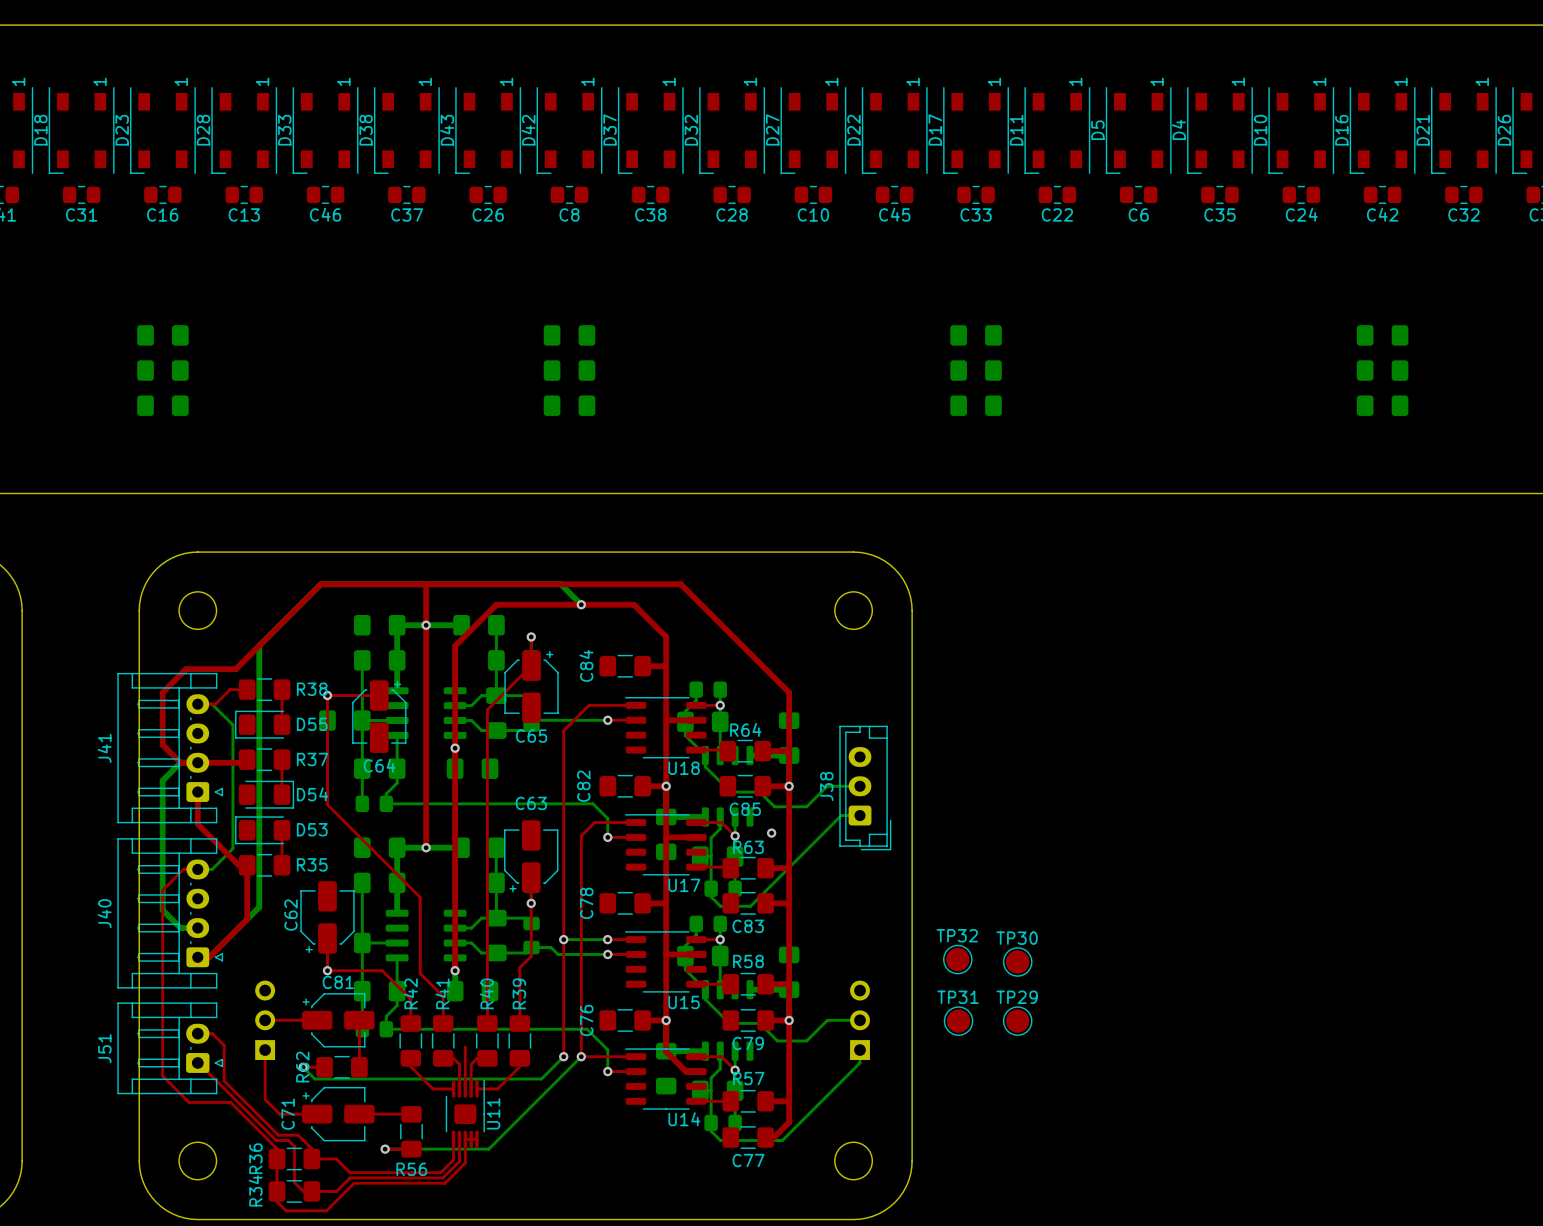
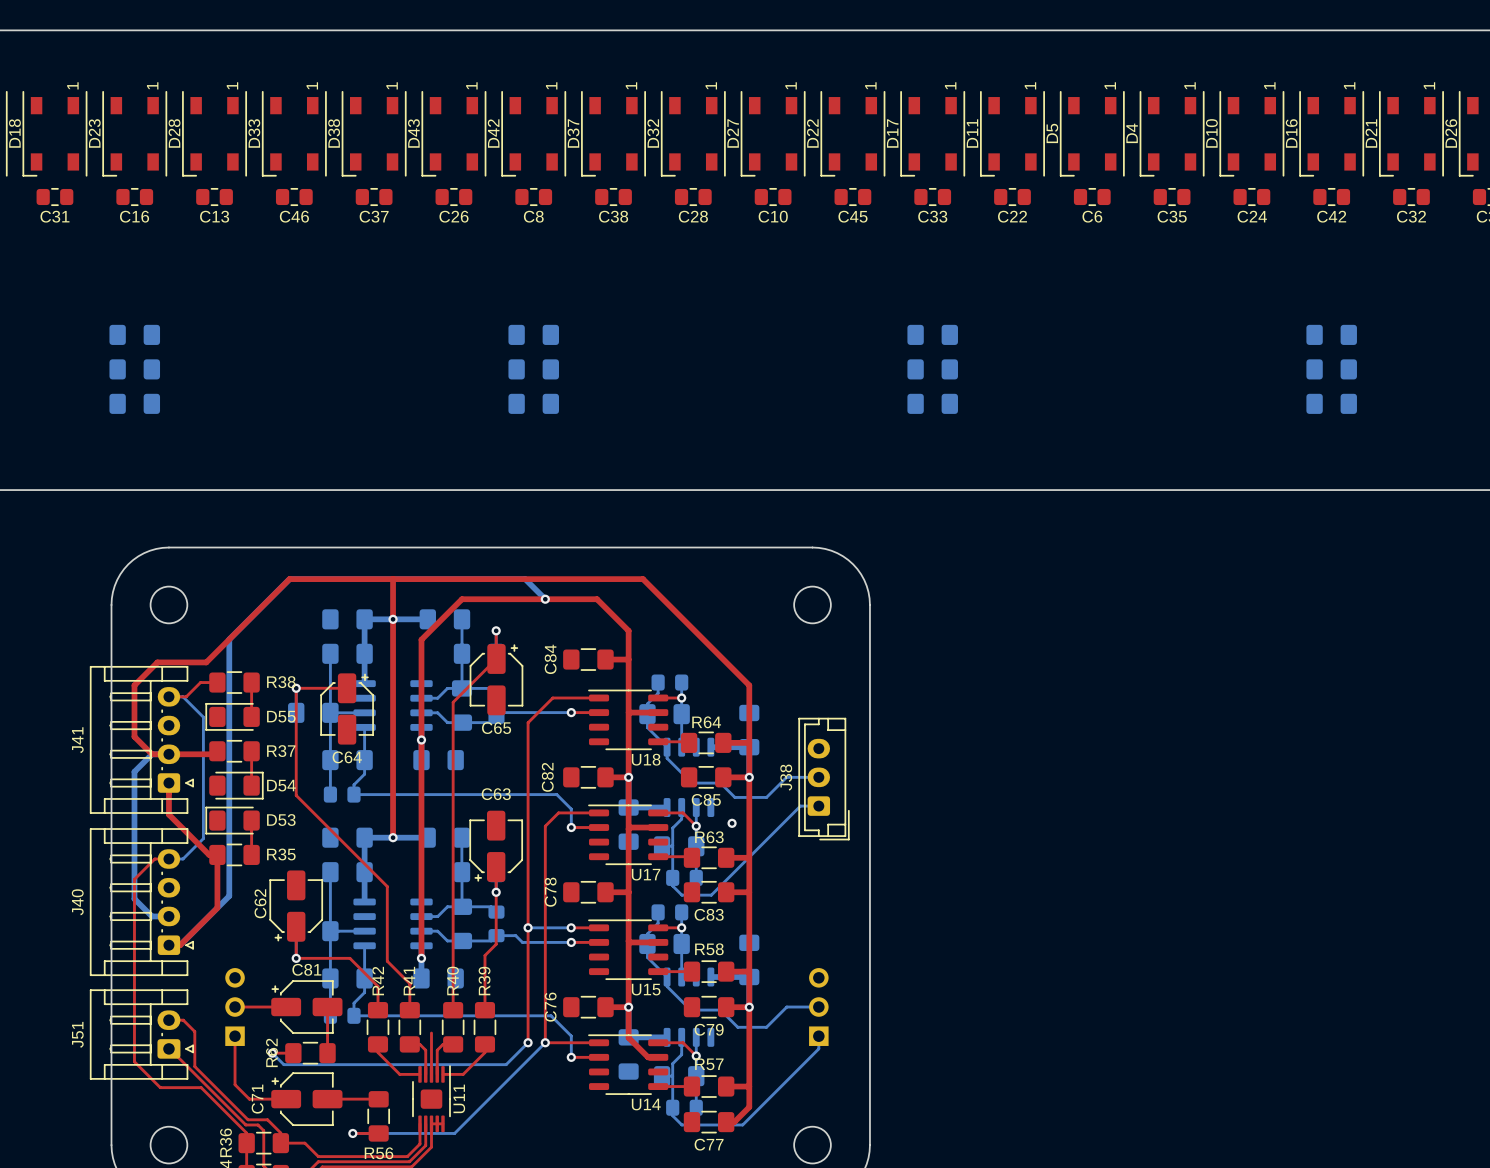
TP32: (957, 959) -> none
TP30: (1017, 961) -> none
TP31: (958, 1021) -> none
TP29: (1017, 1021) -> none

